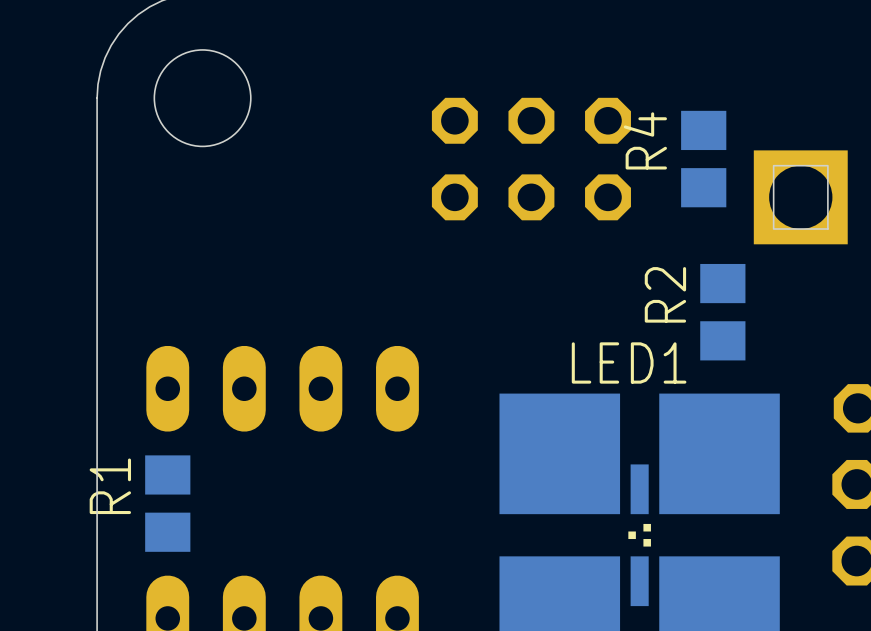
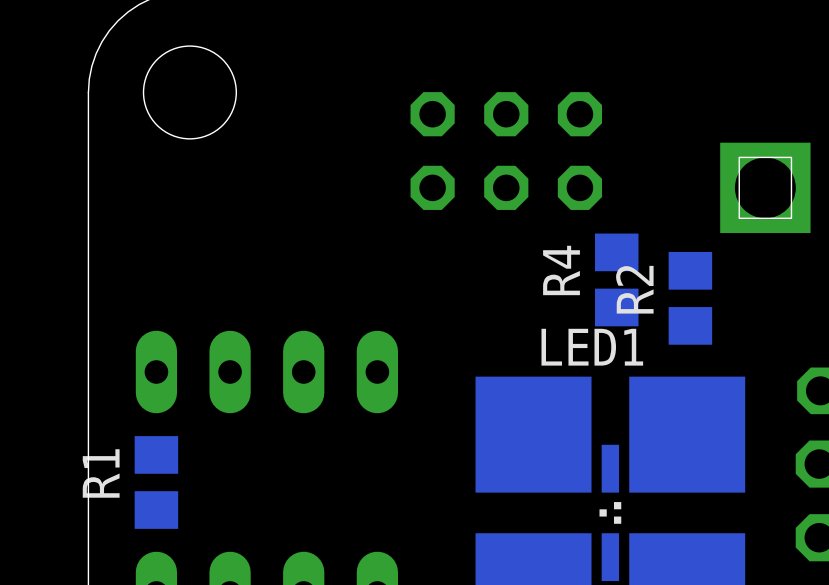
R4 position: (703, 159) -> (616, 279)

